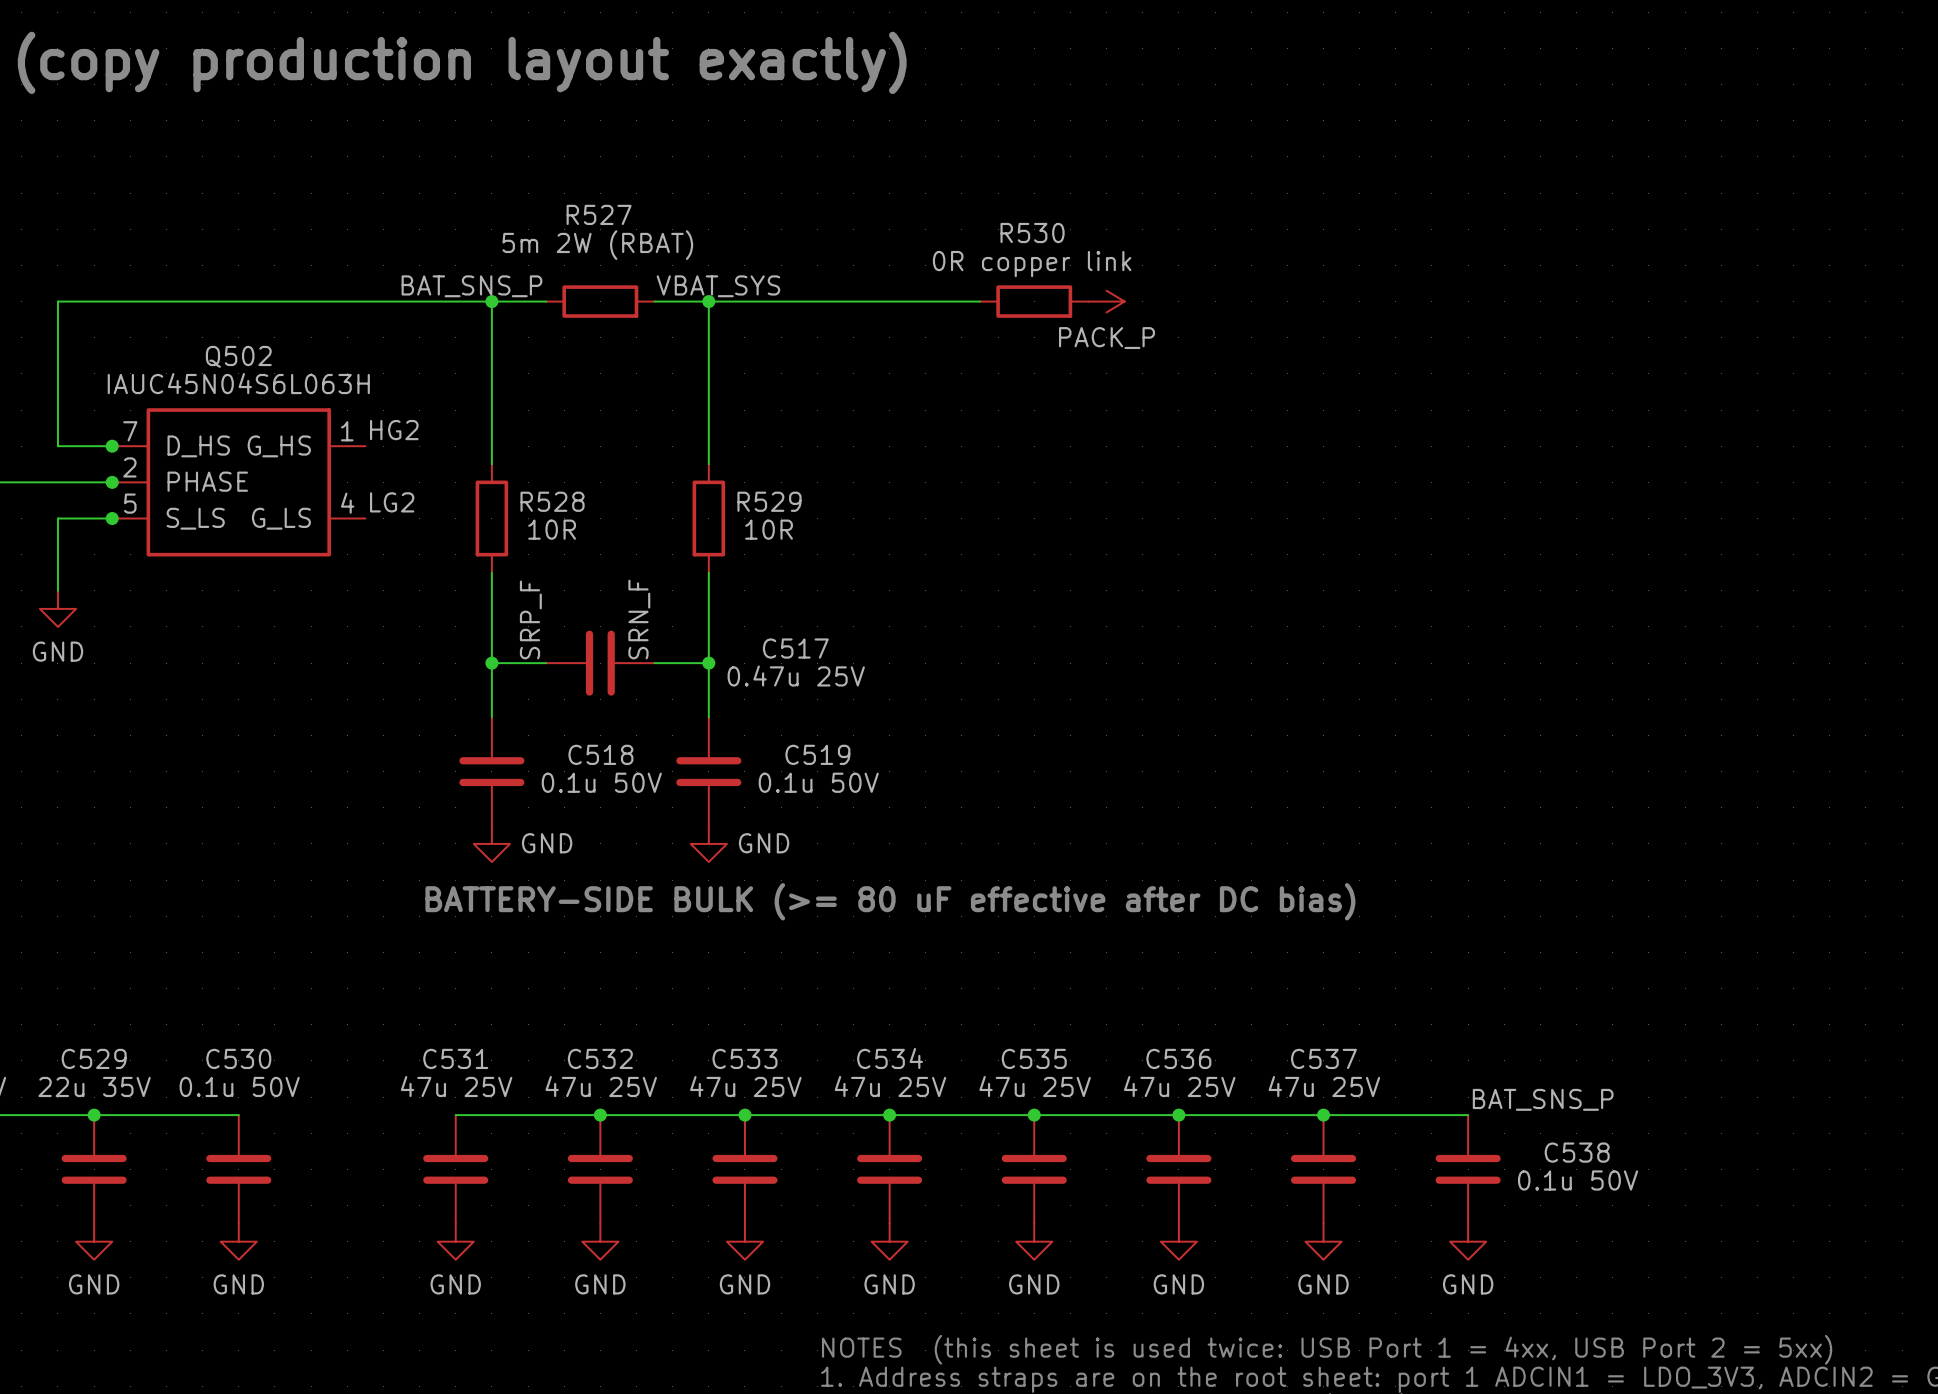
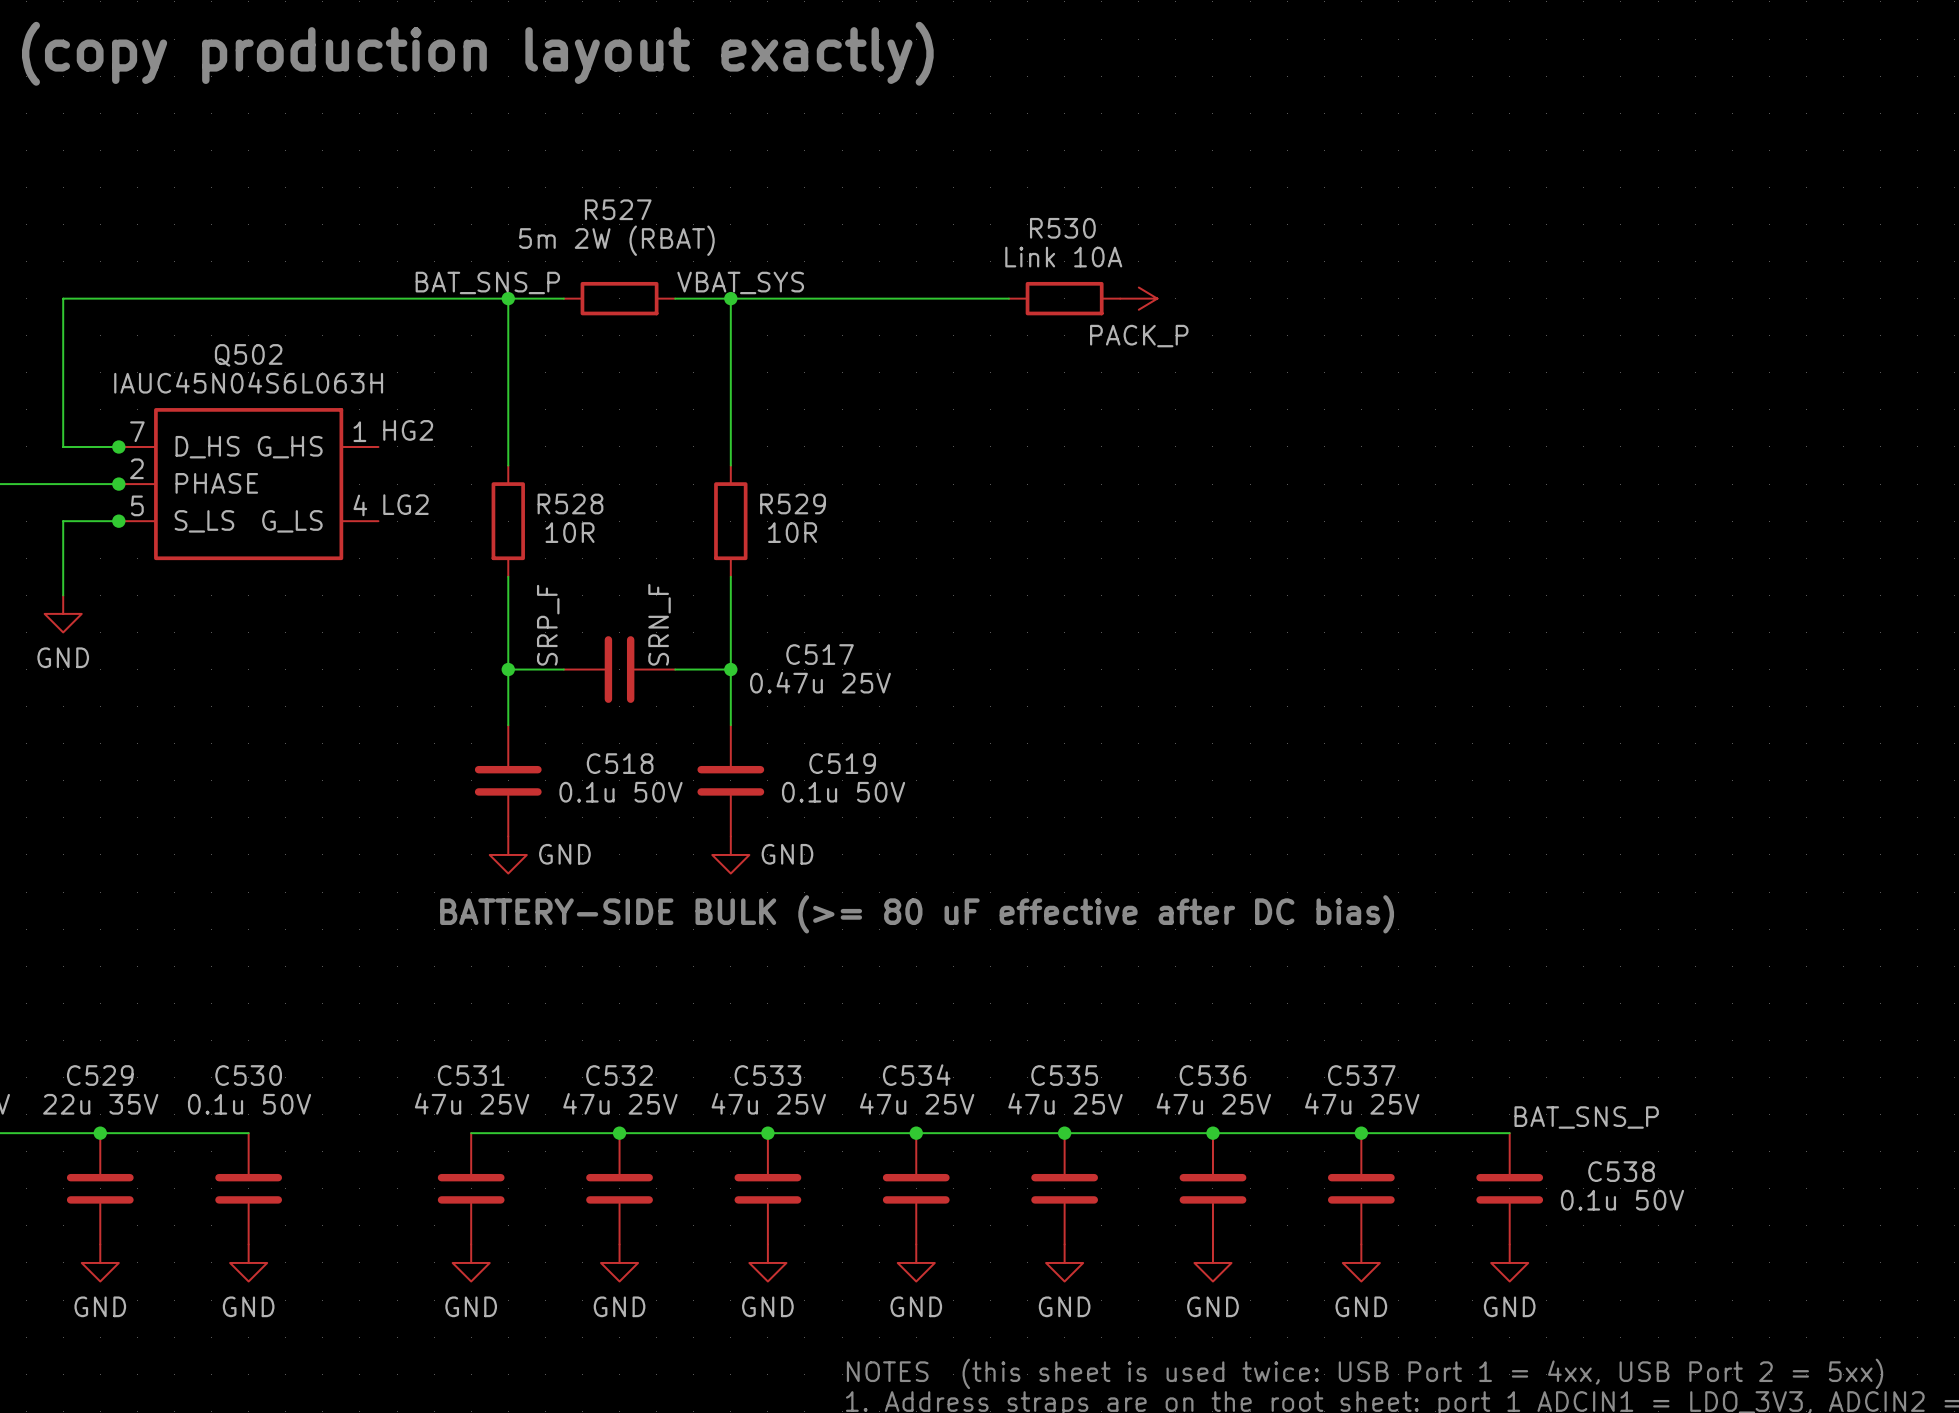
R530 value: 0R copper link (1032, 264) -> Link 10A (1063, 257)

